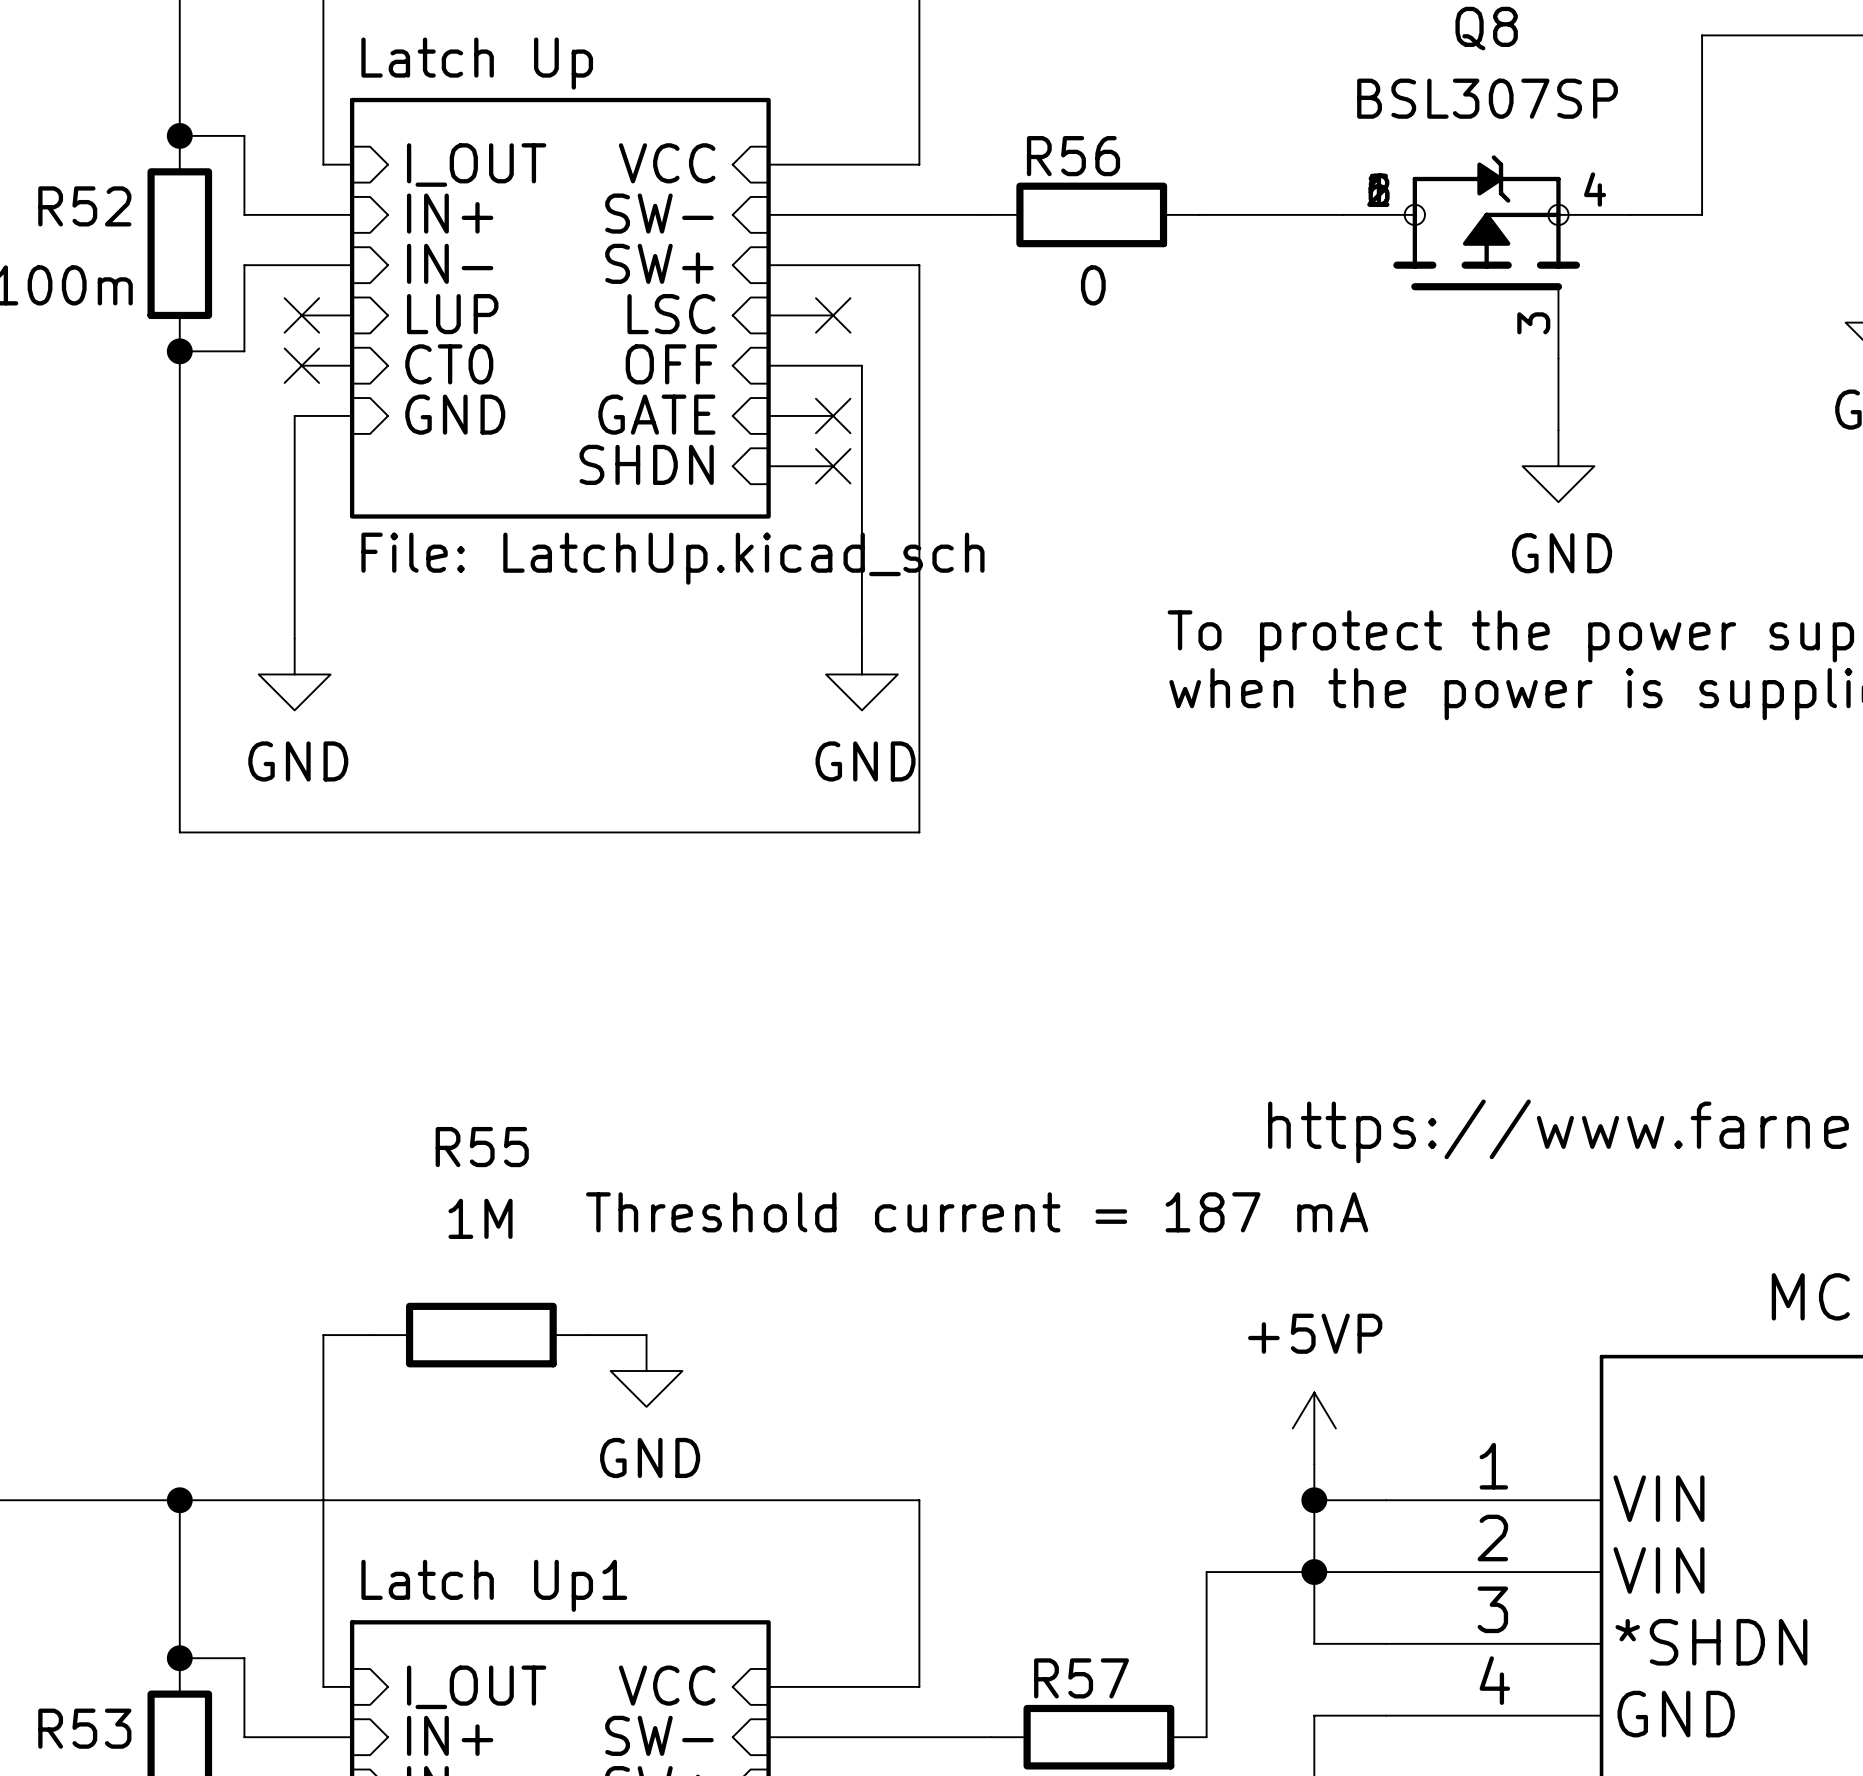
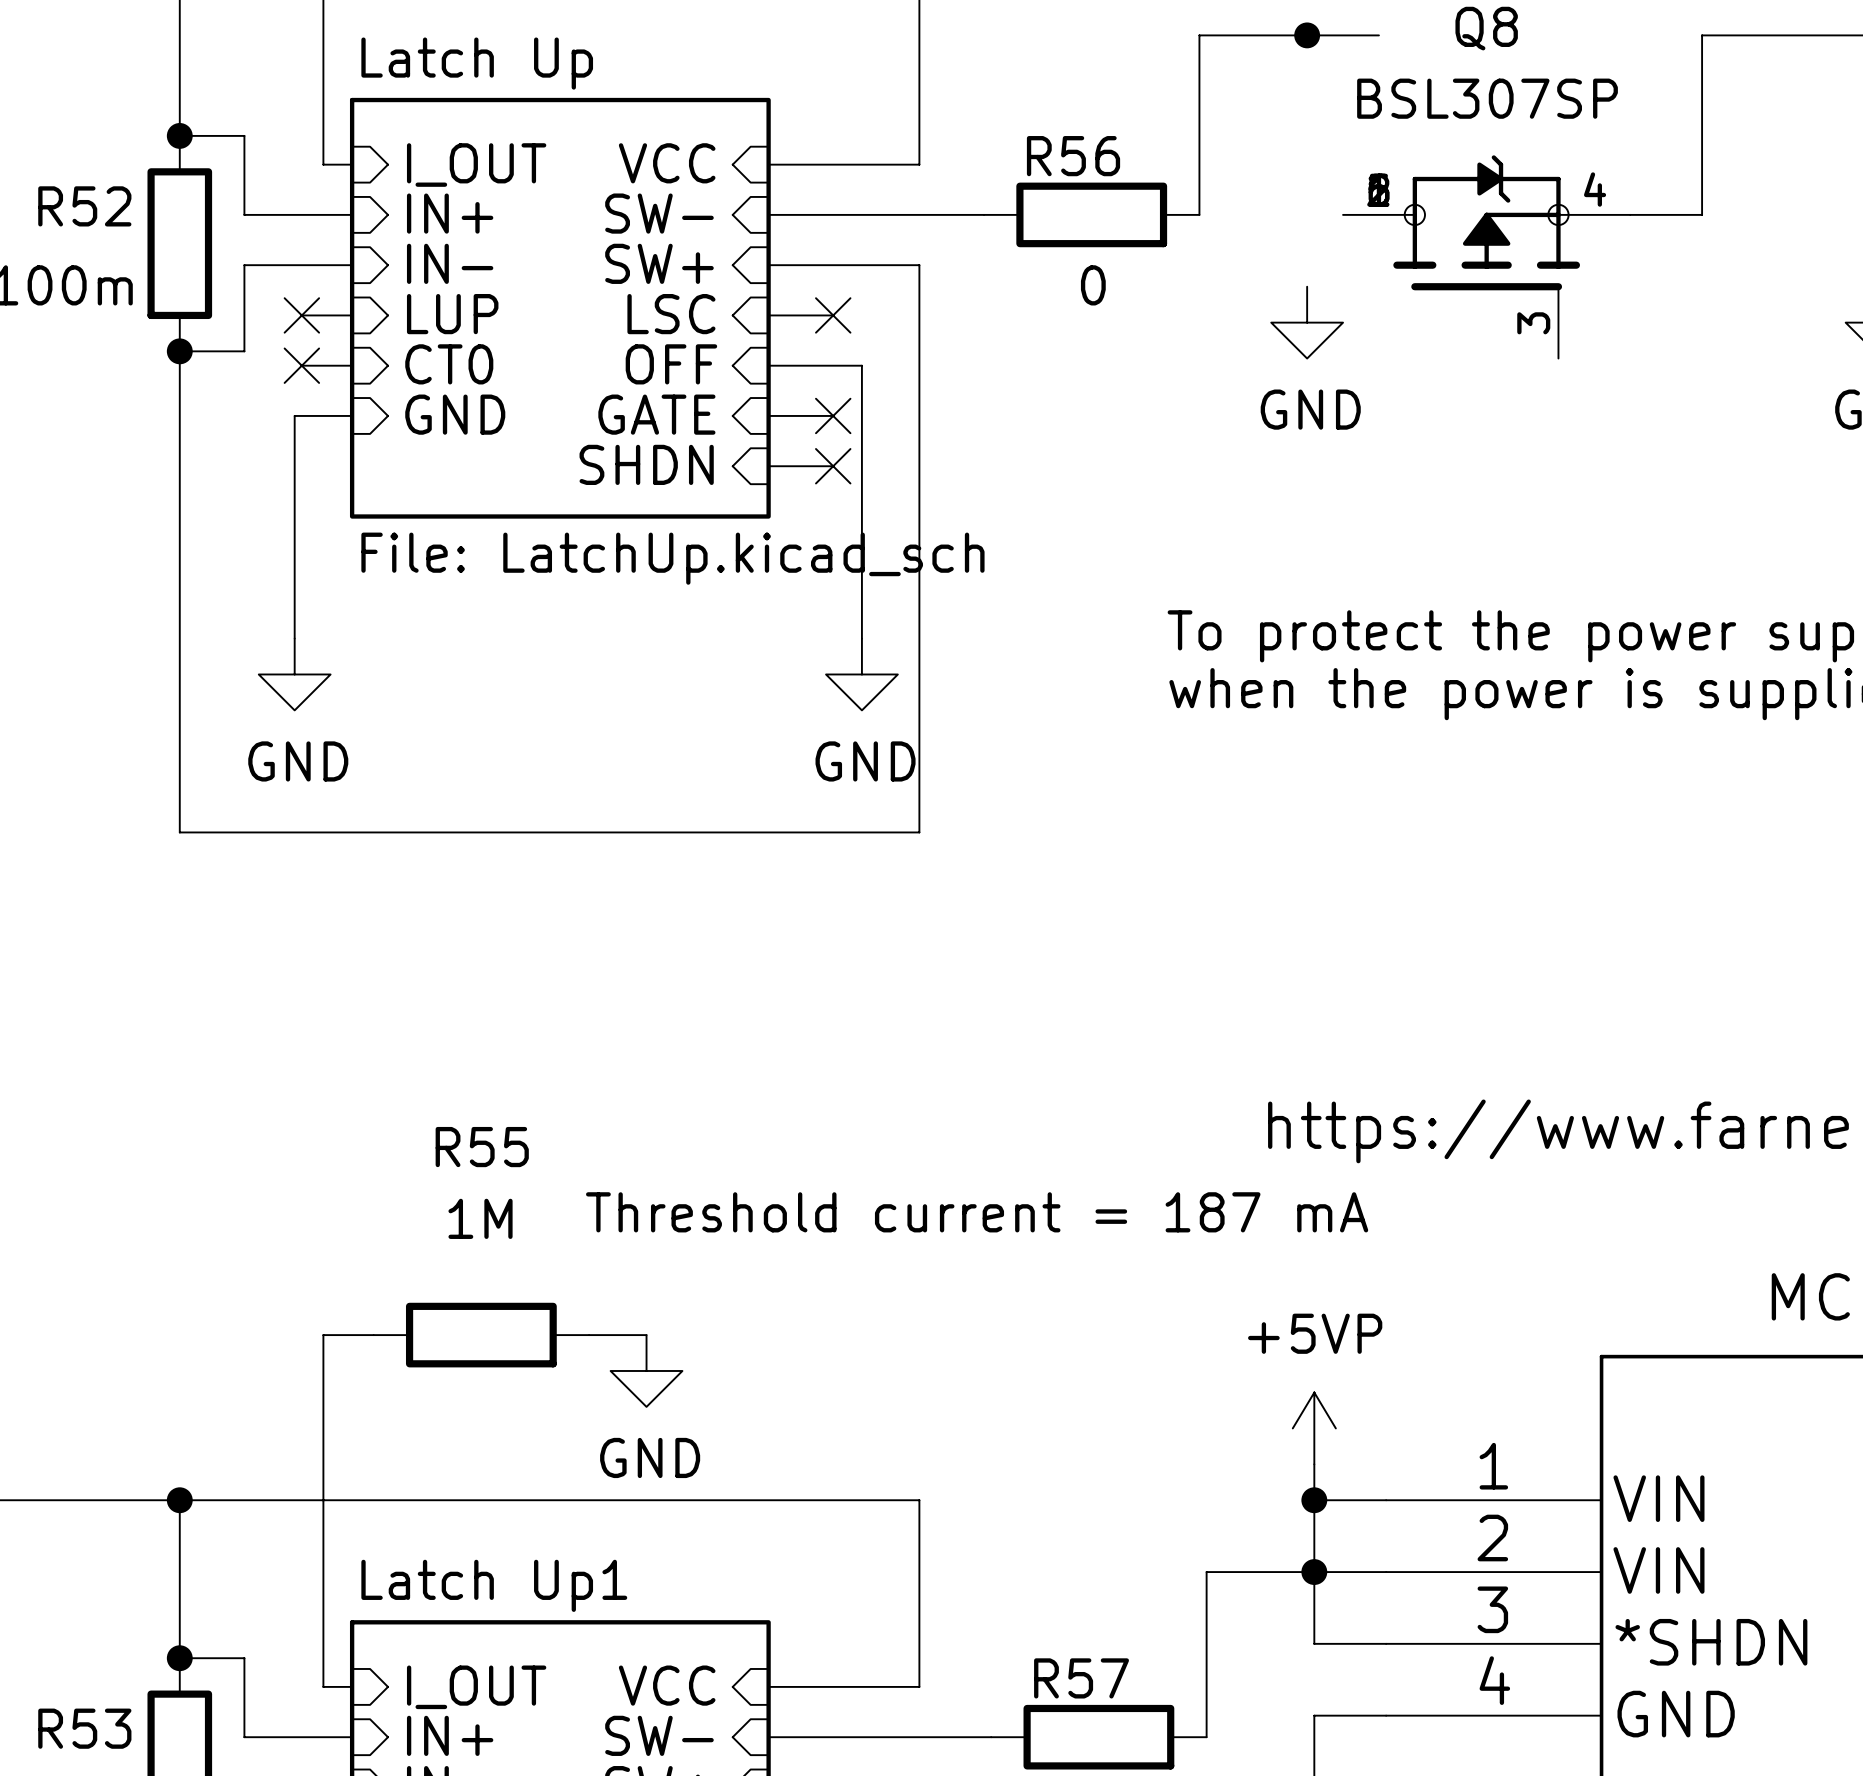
junction: none -> (1307, 35)
wire: (1199, 214) (1343, 214) -> (1199, 214) (1199, 35) (1378, 35)
wire: (1558, 358) (1558, 430) -> none
power symbol position: GND (1558, 466) -> GND (1307, 322)

